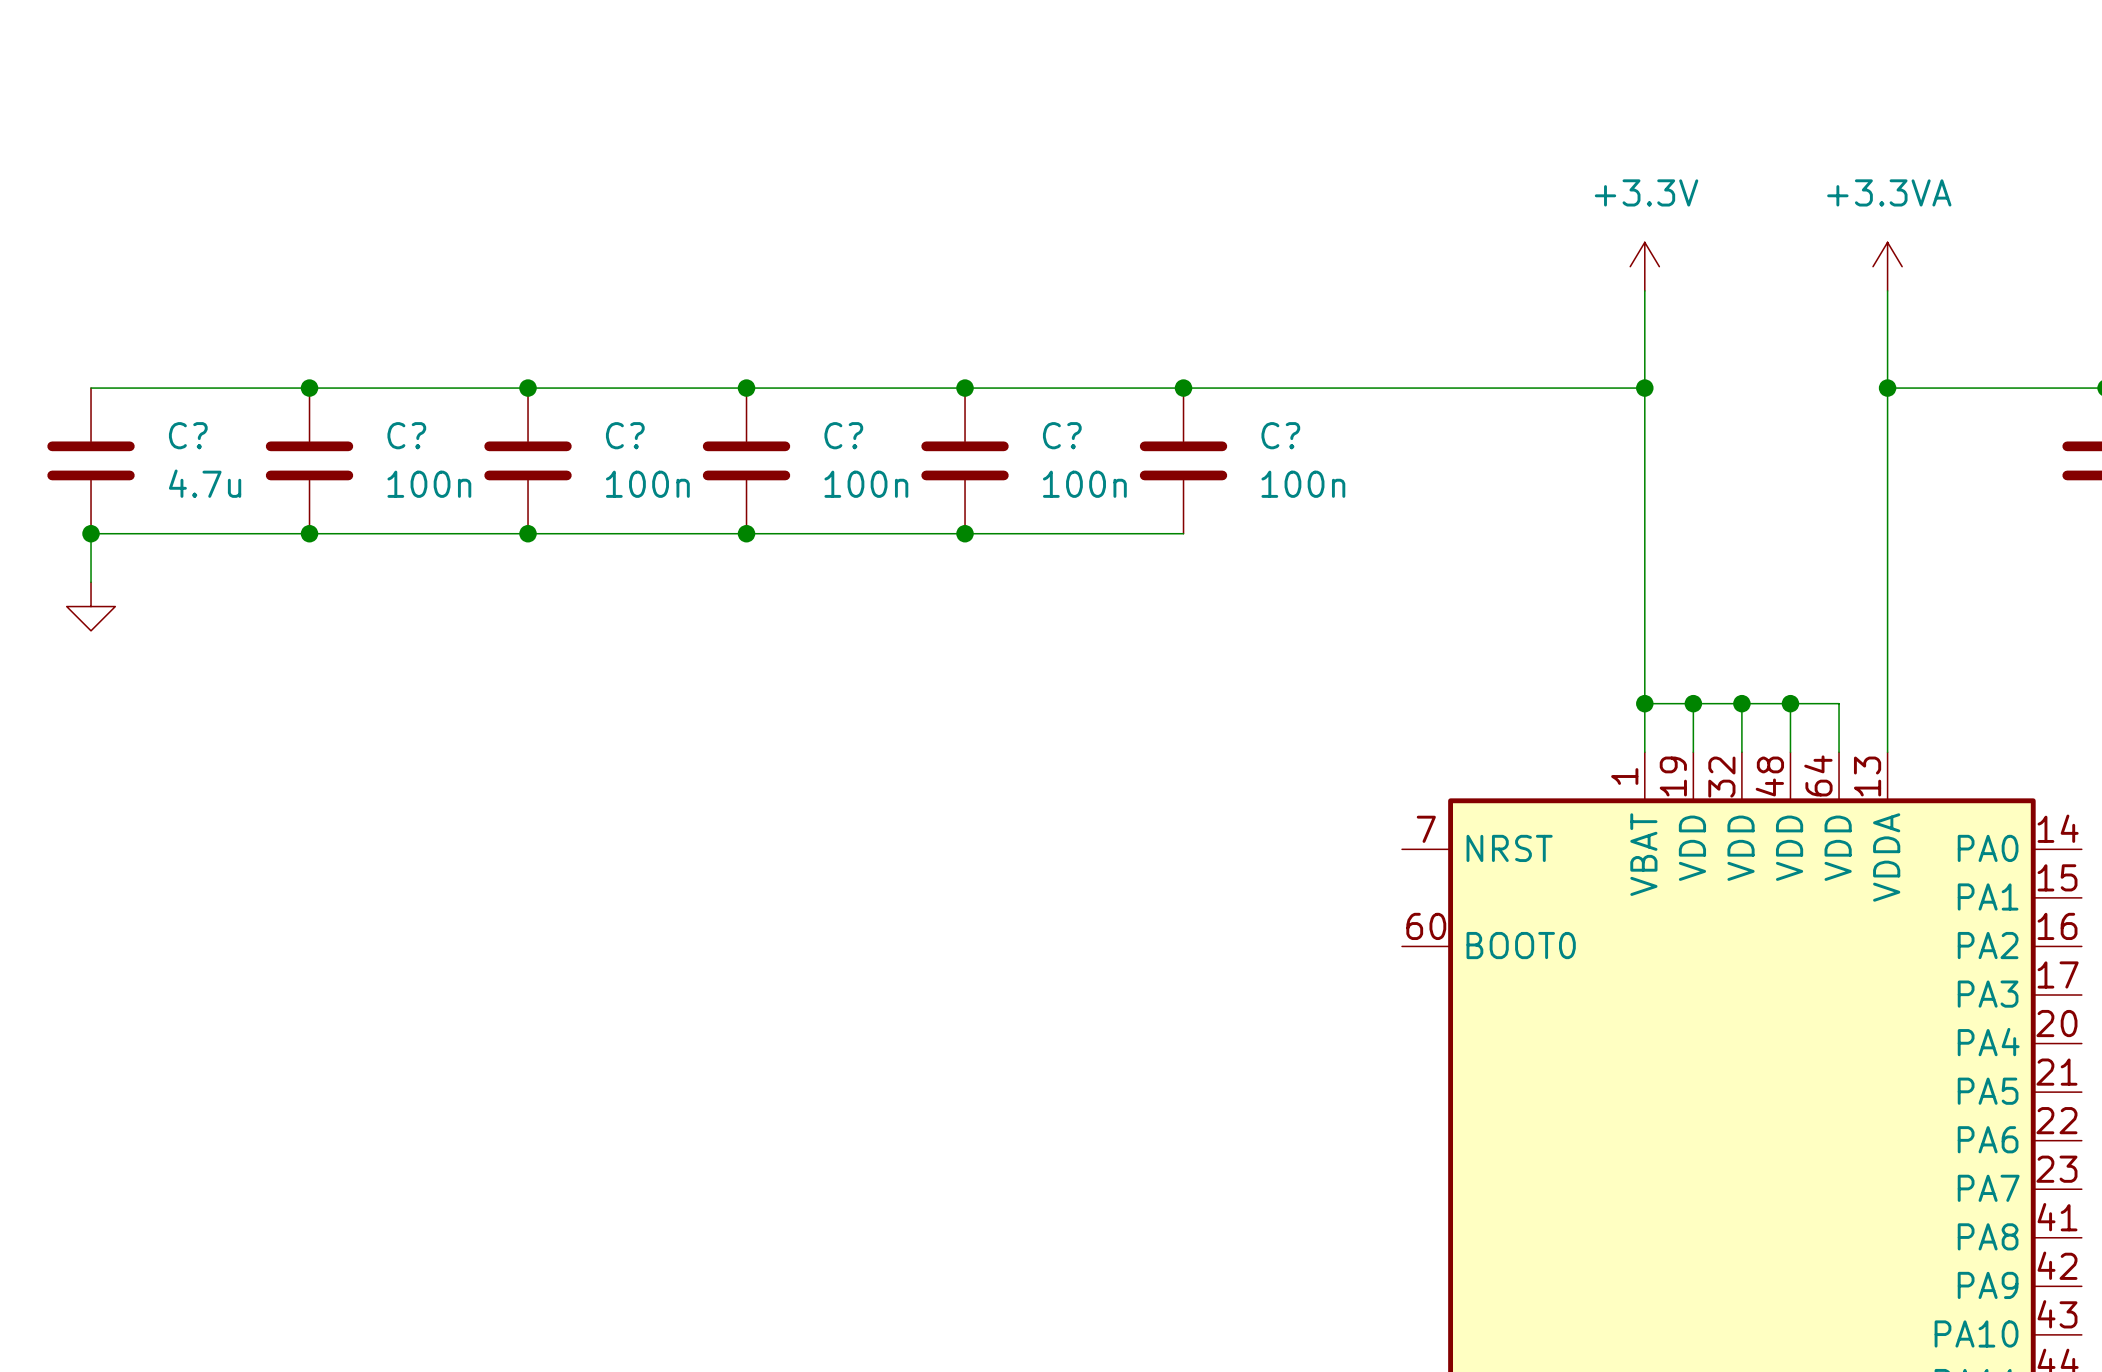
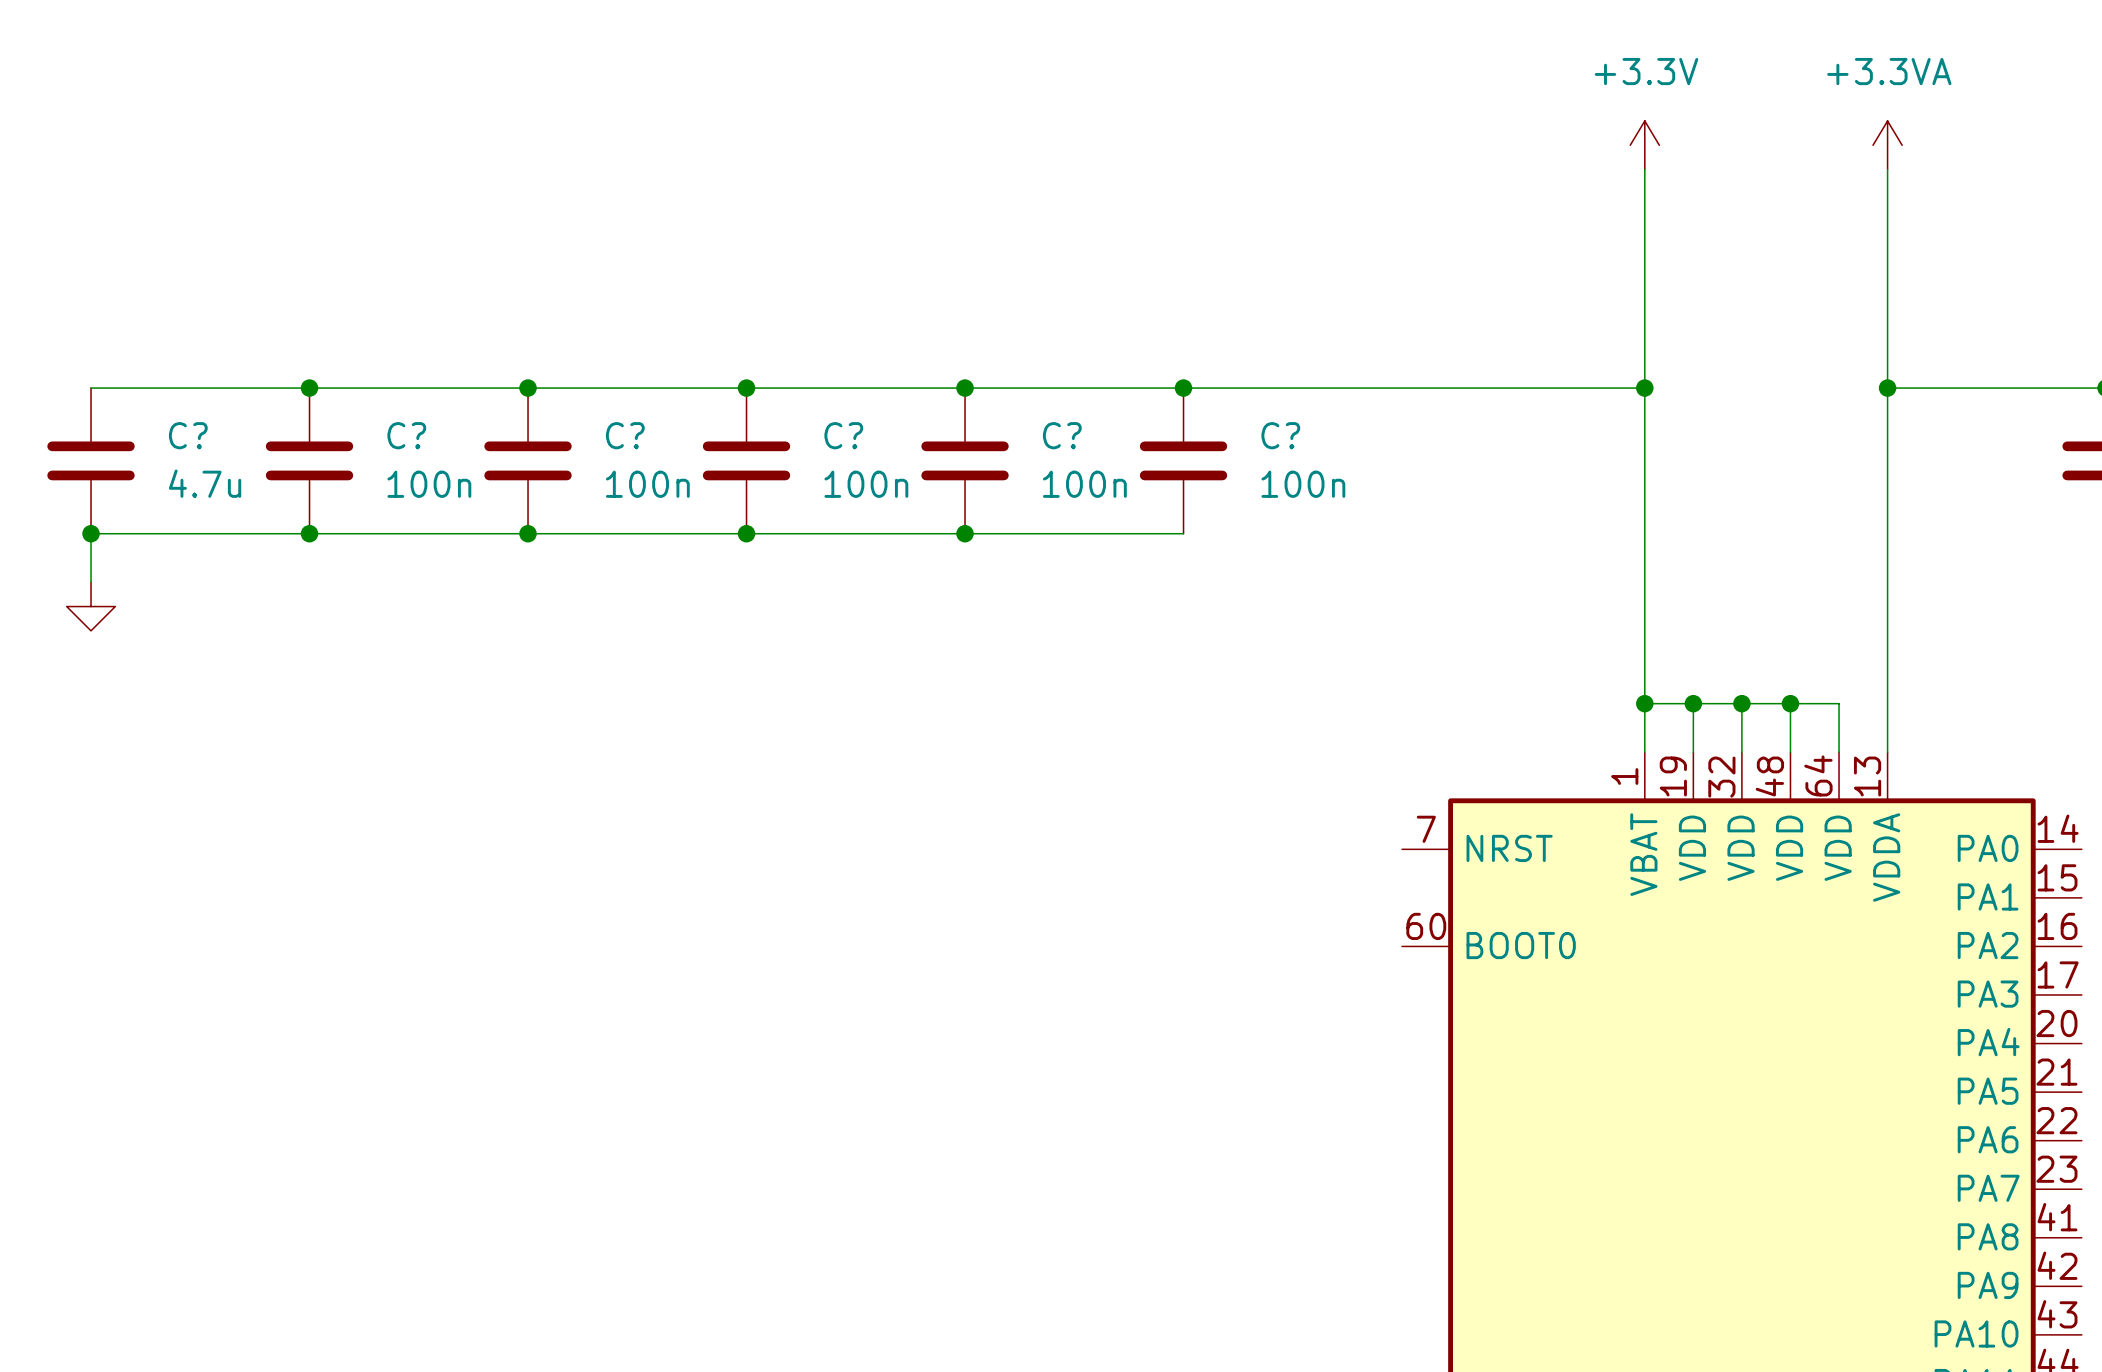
wire: none -> (1644, 169) (1644, 290)
wire: none -> (1887, 169) (1887, 290)
power symbol position: +3.3V (1644, 266) -> +3.3V (1644, 145)
power symbol position: +3.3VA (1887, 266) -> +3.3VA (1887, 145)

